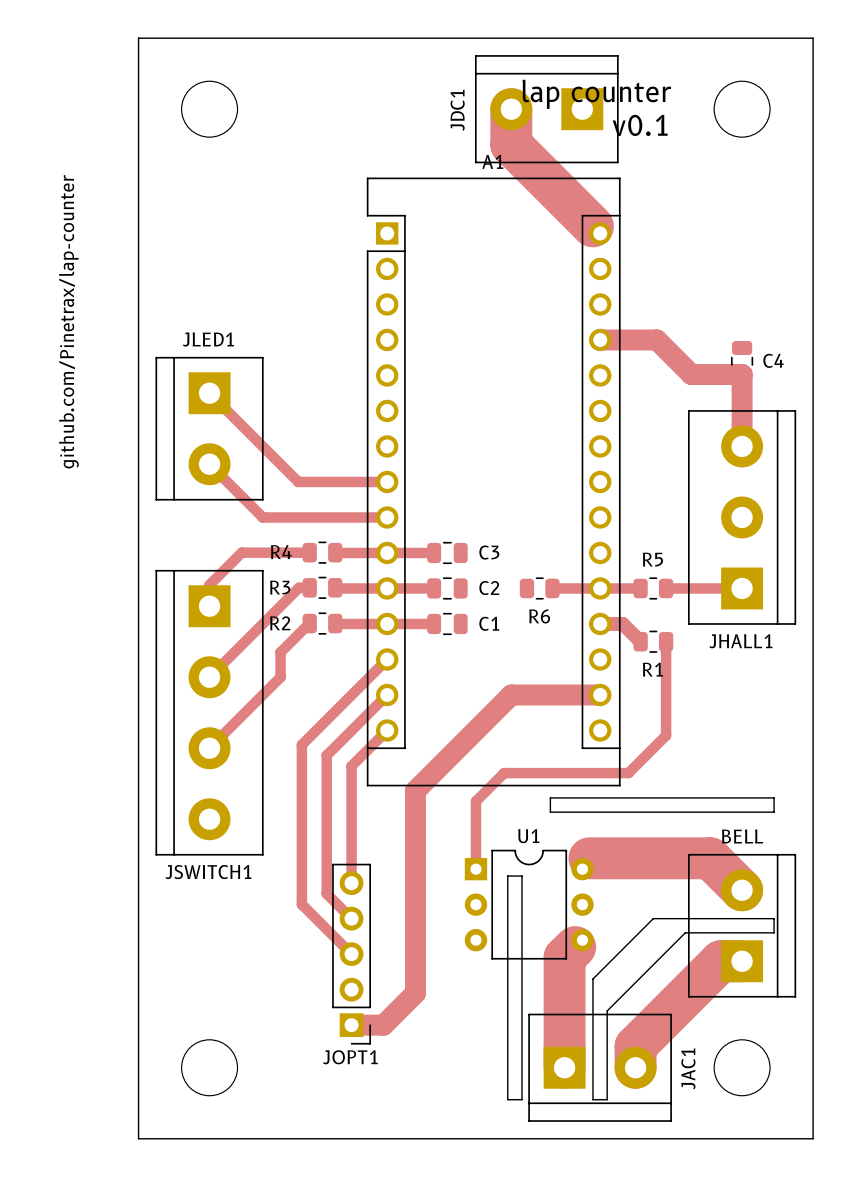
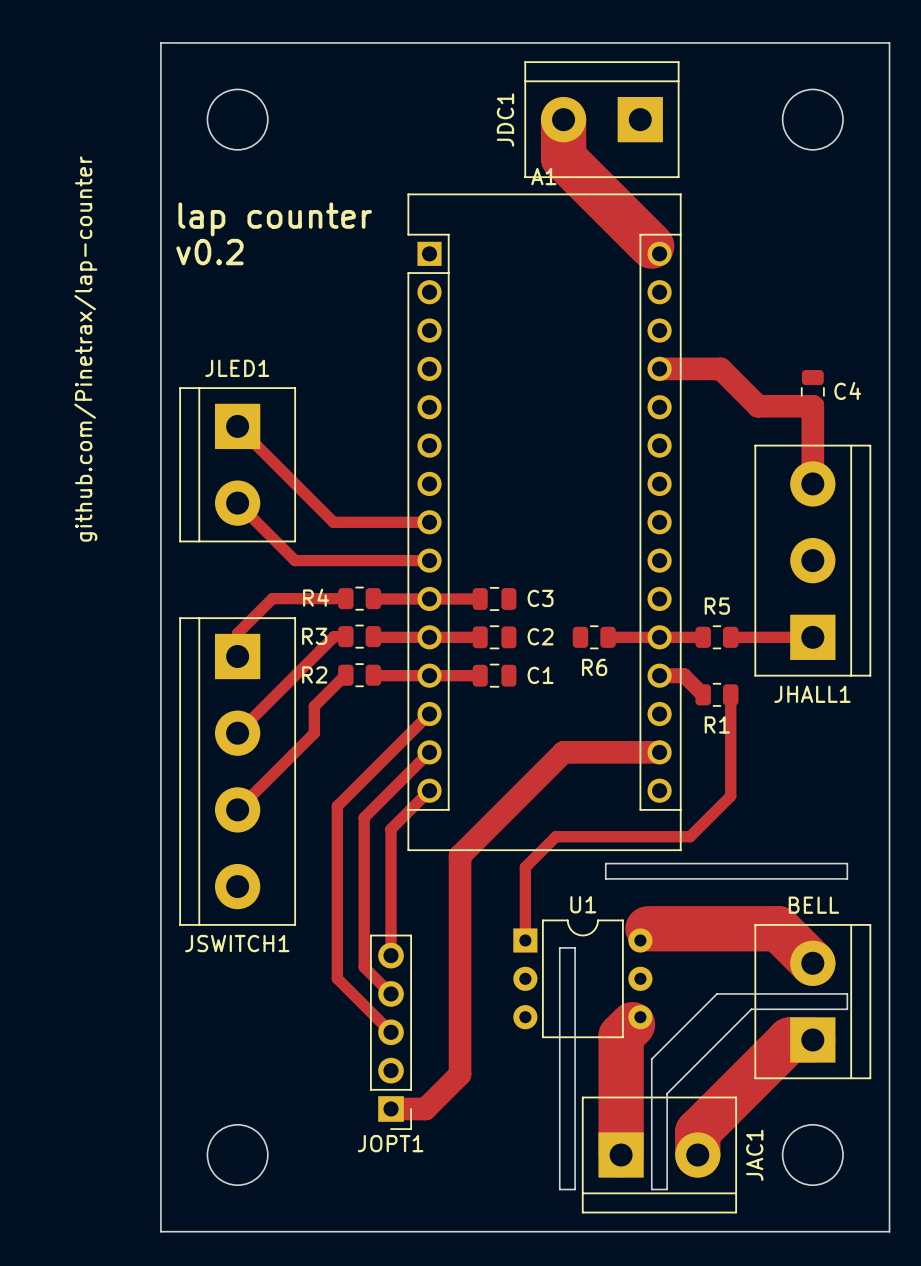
text: lap counter (596, 94) -> none
text: v0.1 (640, 125) -> none
text: none -> lap counter (275, 219)
text: none -> v0.2 (209, 252)

